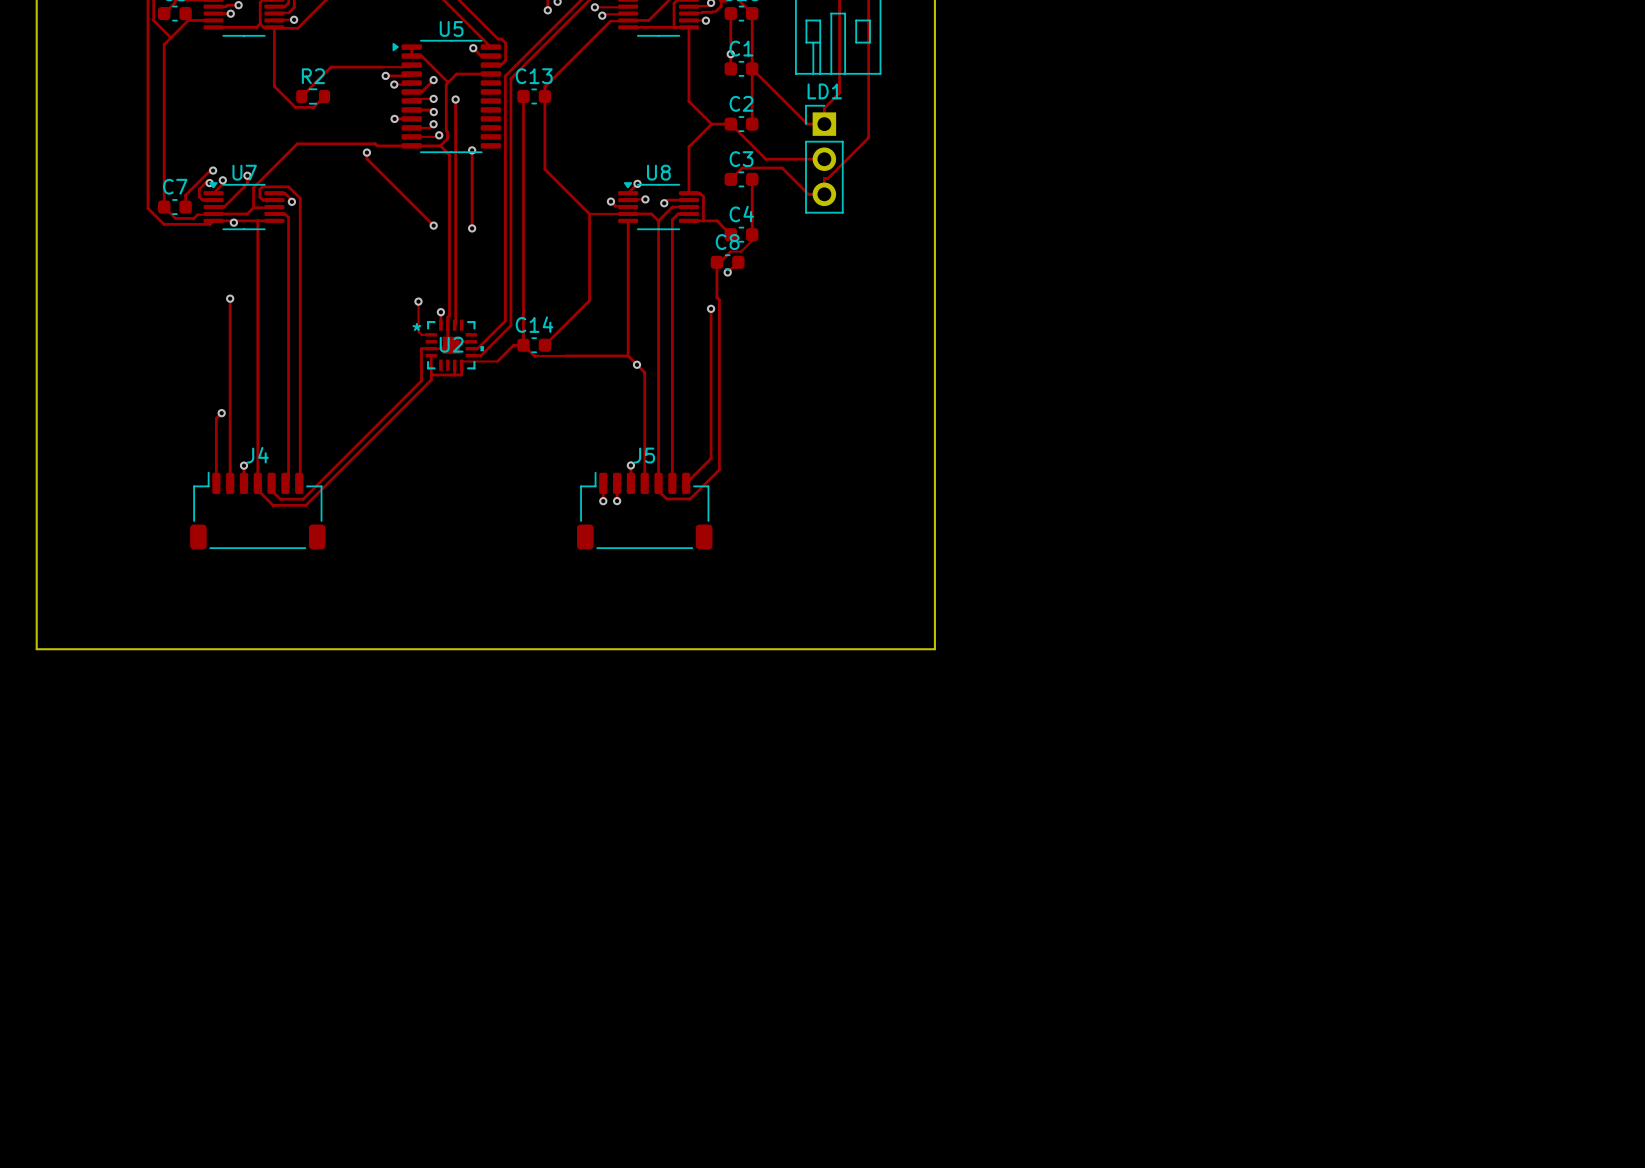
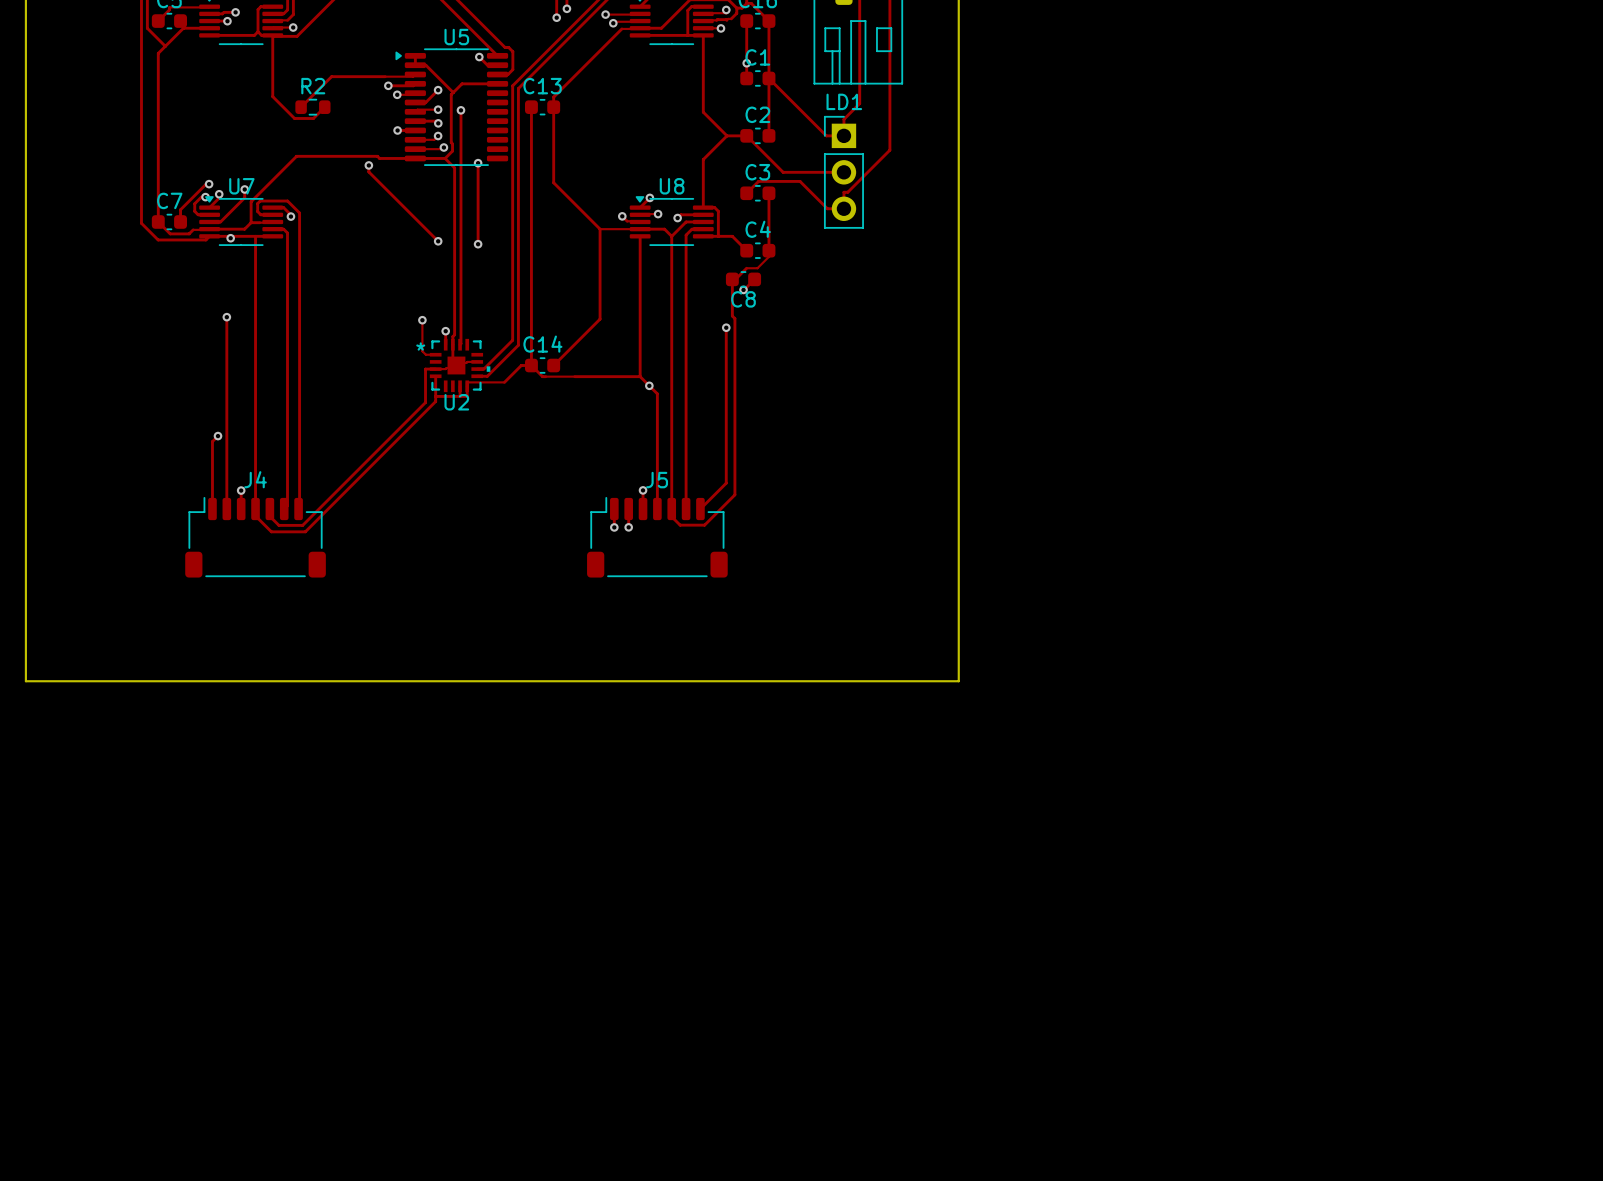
C8 name position: C8 (727, 242) -> C8 (743, 299)
U2 name position: U2 (451, 344) -> U2 (456, 402)

